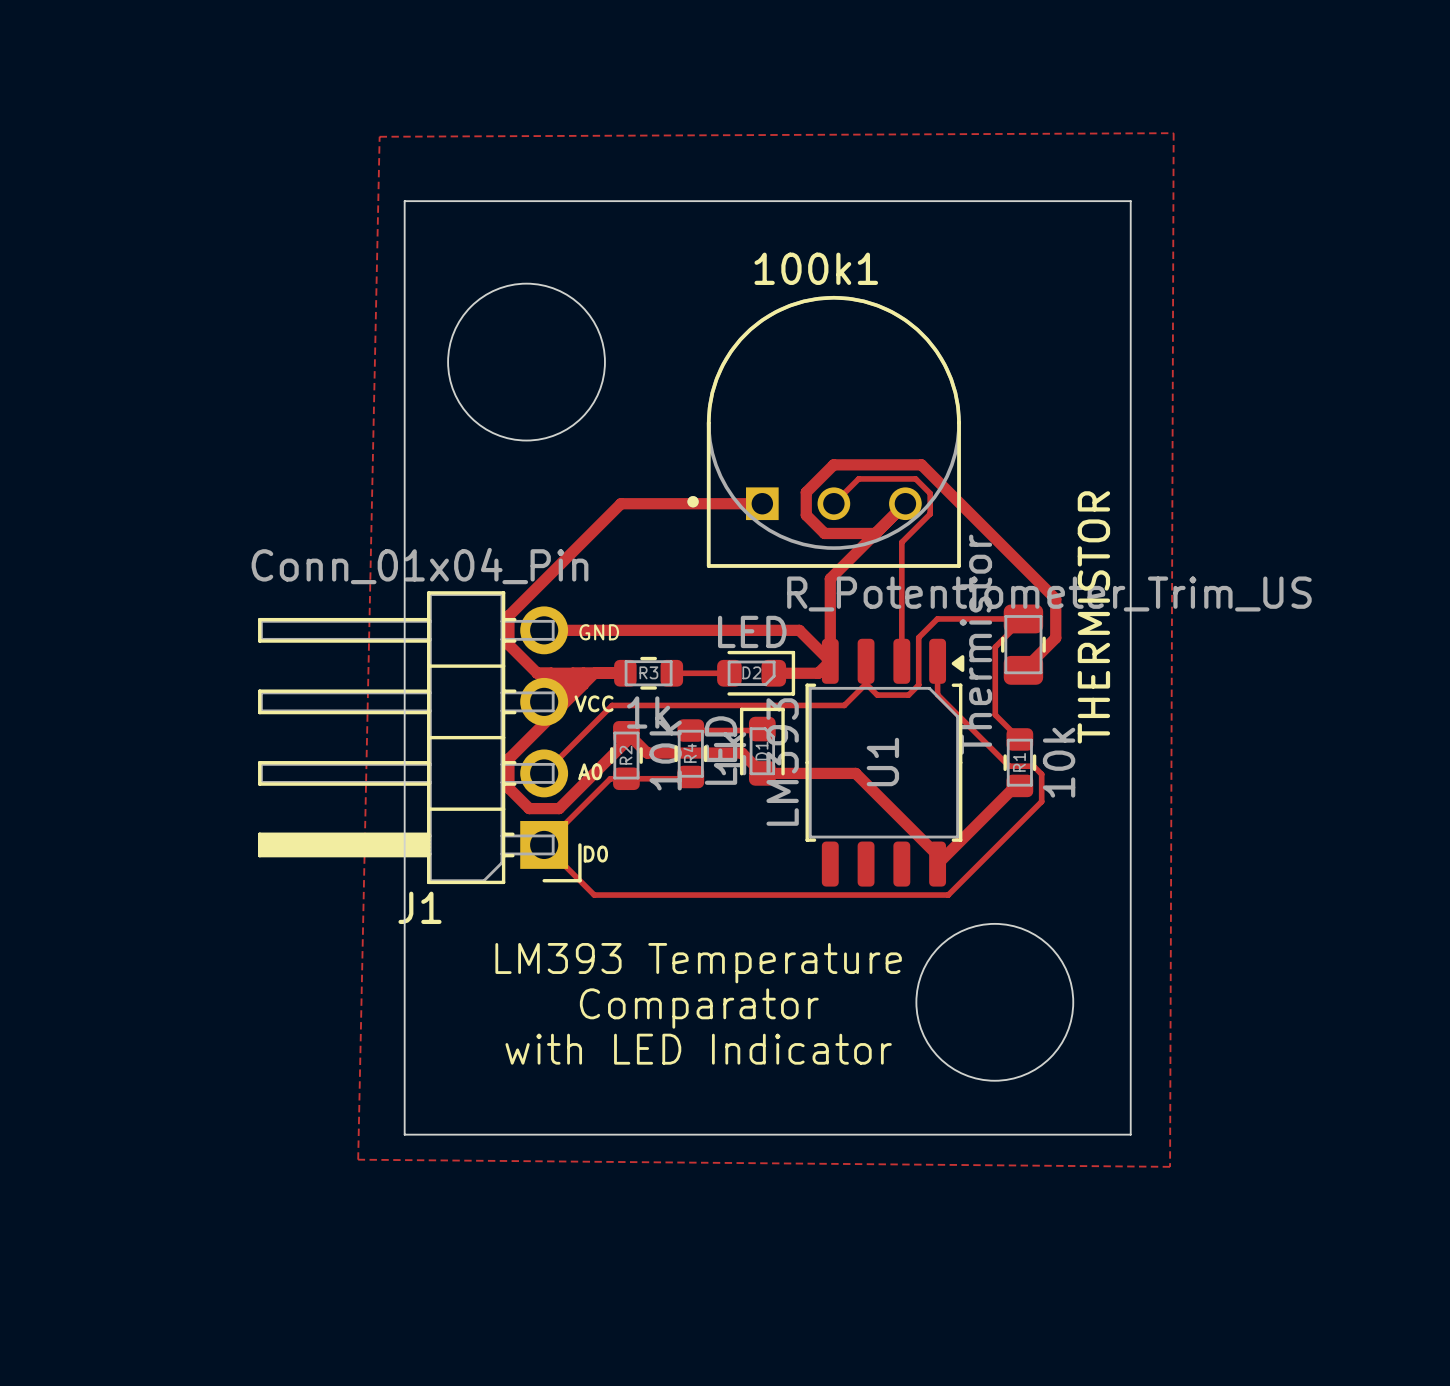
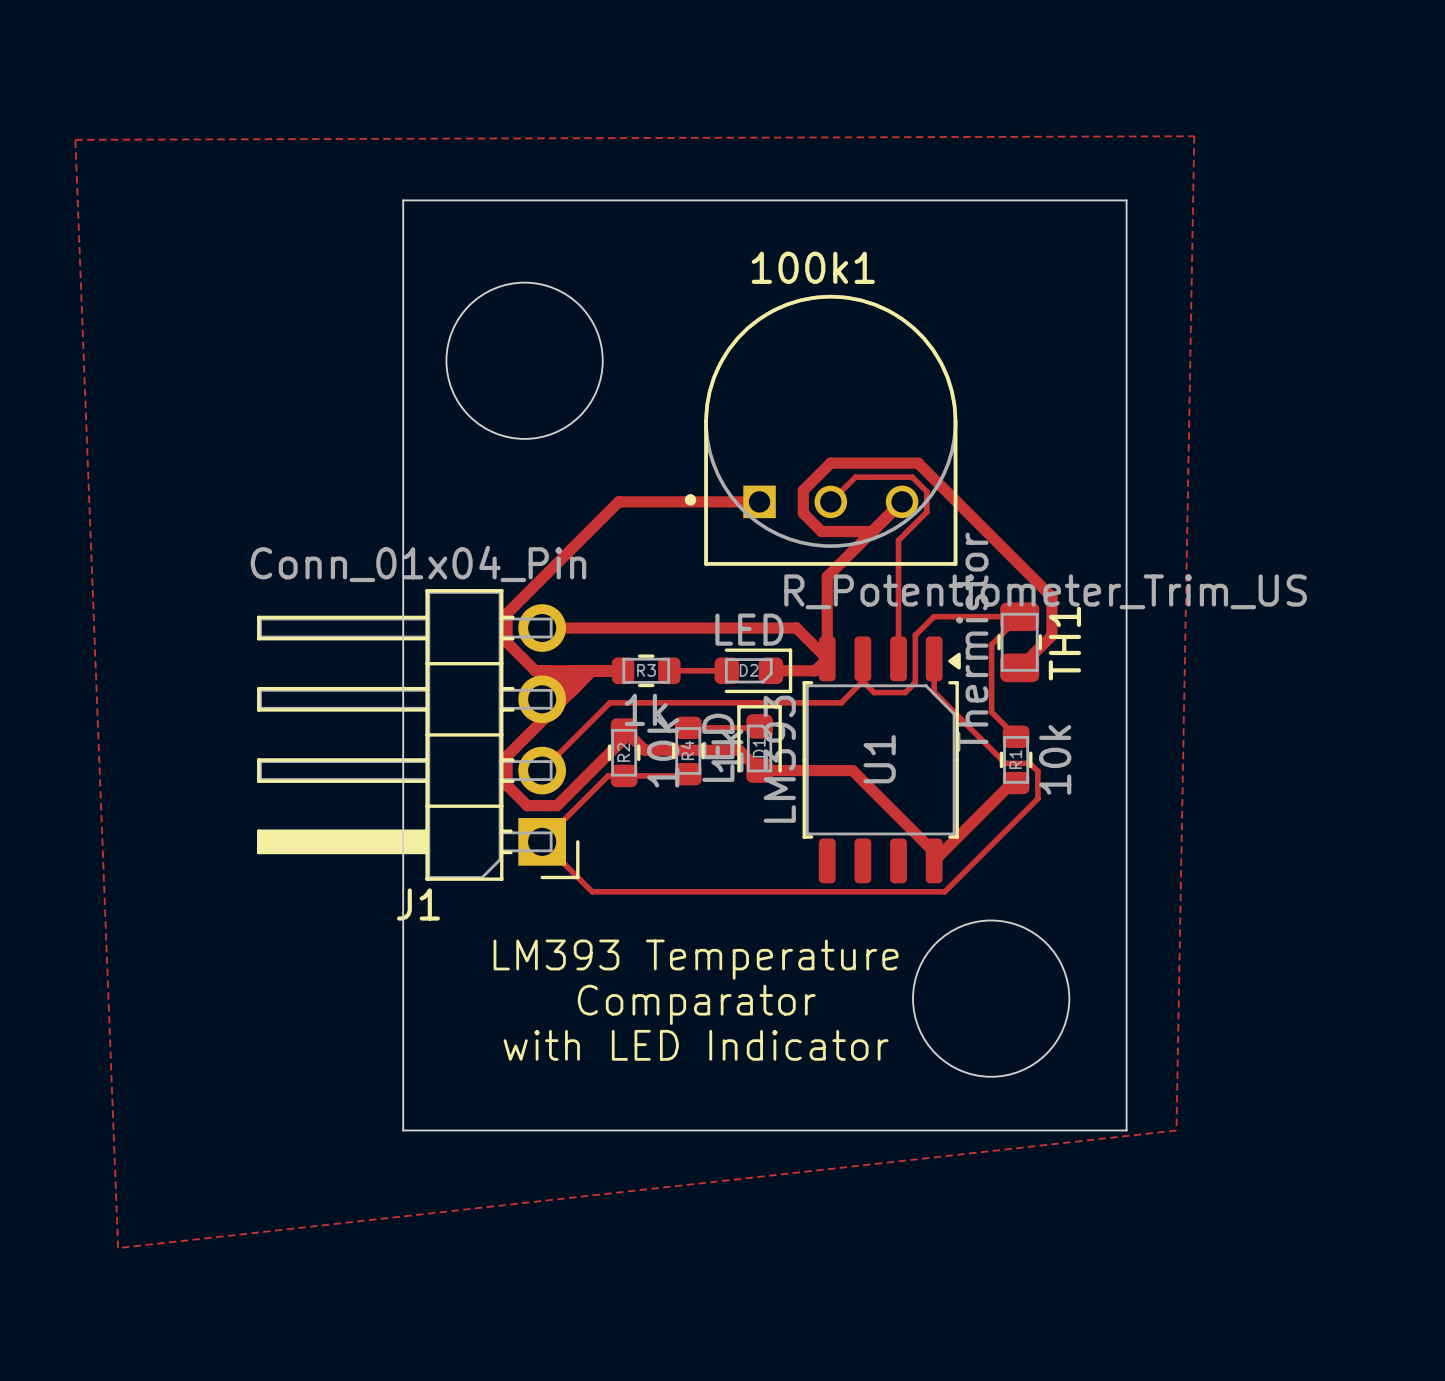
zone outline: (1173, 133) (379, 136) (358, 1159) (1170, 1166) (1173, 133) -> (1194, 136) (75, 139) (118, 1248) (1176, 1130) (1194, 136)
THERMISTOR name: THERMISTOR (1093, 617) -> TH1 (1064, 643)
text: GND (599, 632) -> none
text: VCC (594, 703) -> none
text: A0 (590, 771) -> none
text: D0 (595, 854) -> none

